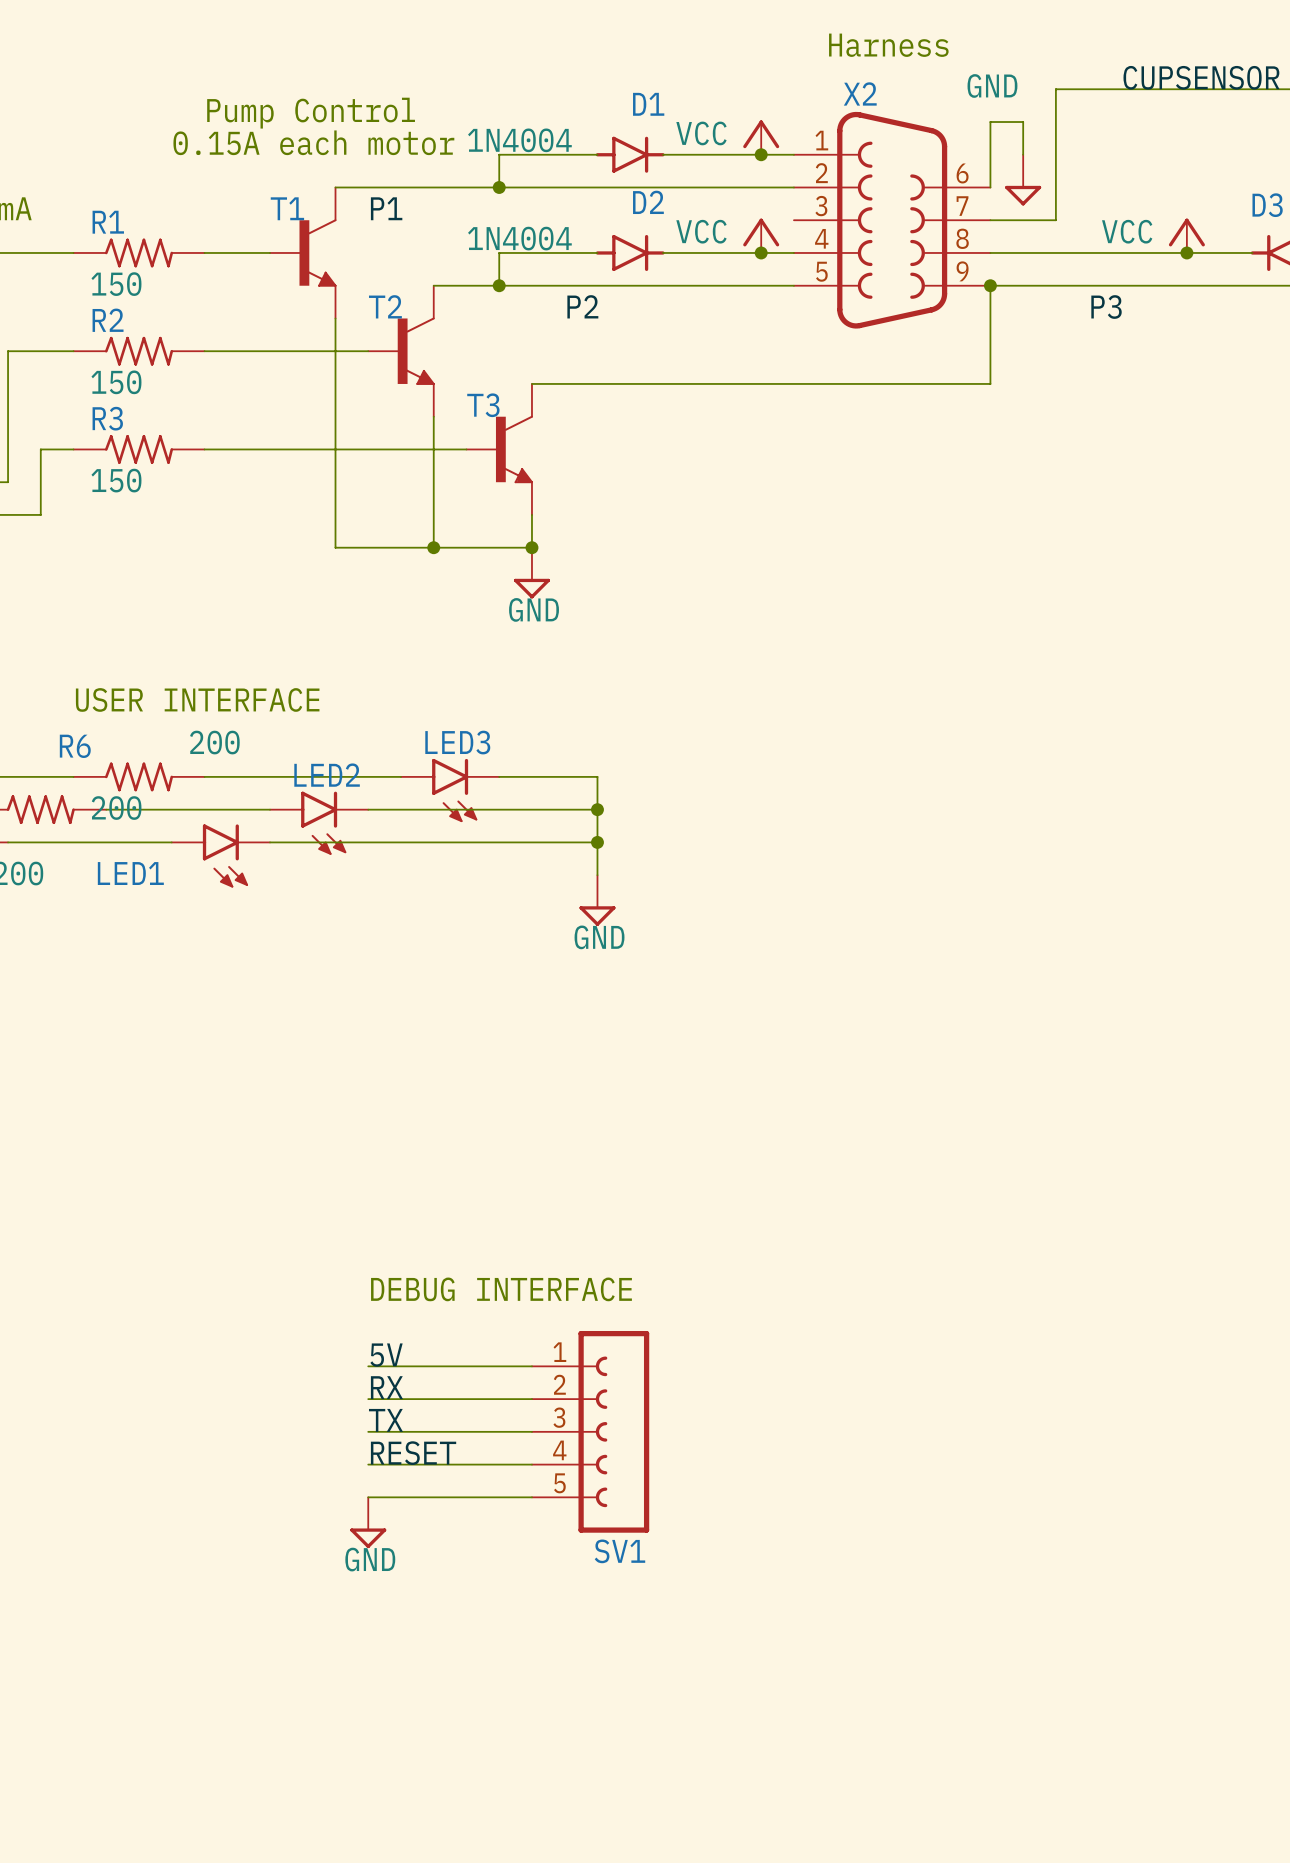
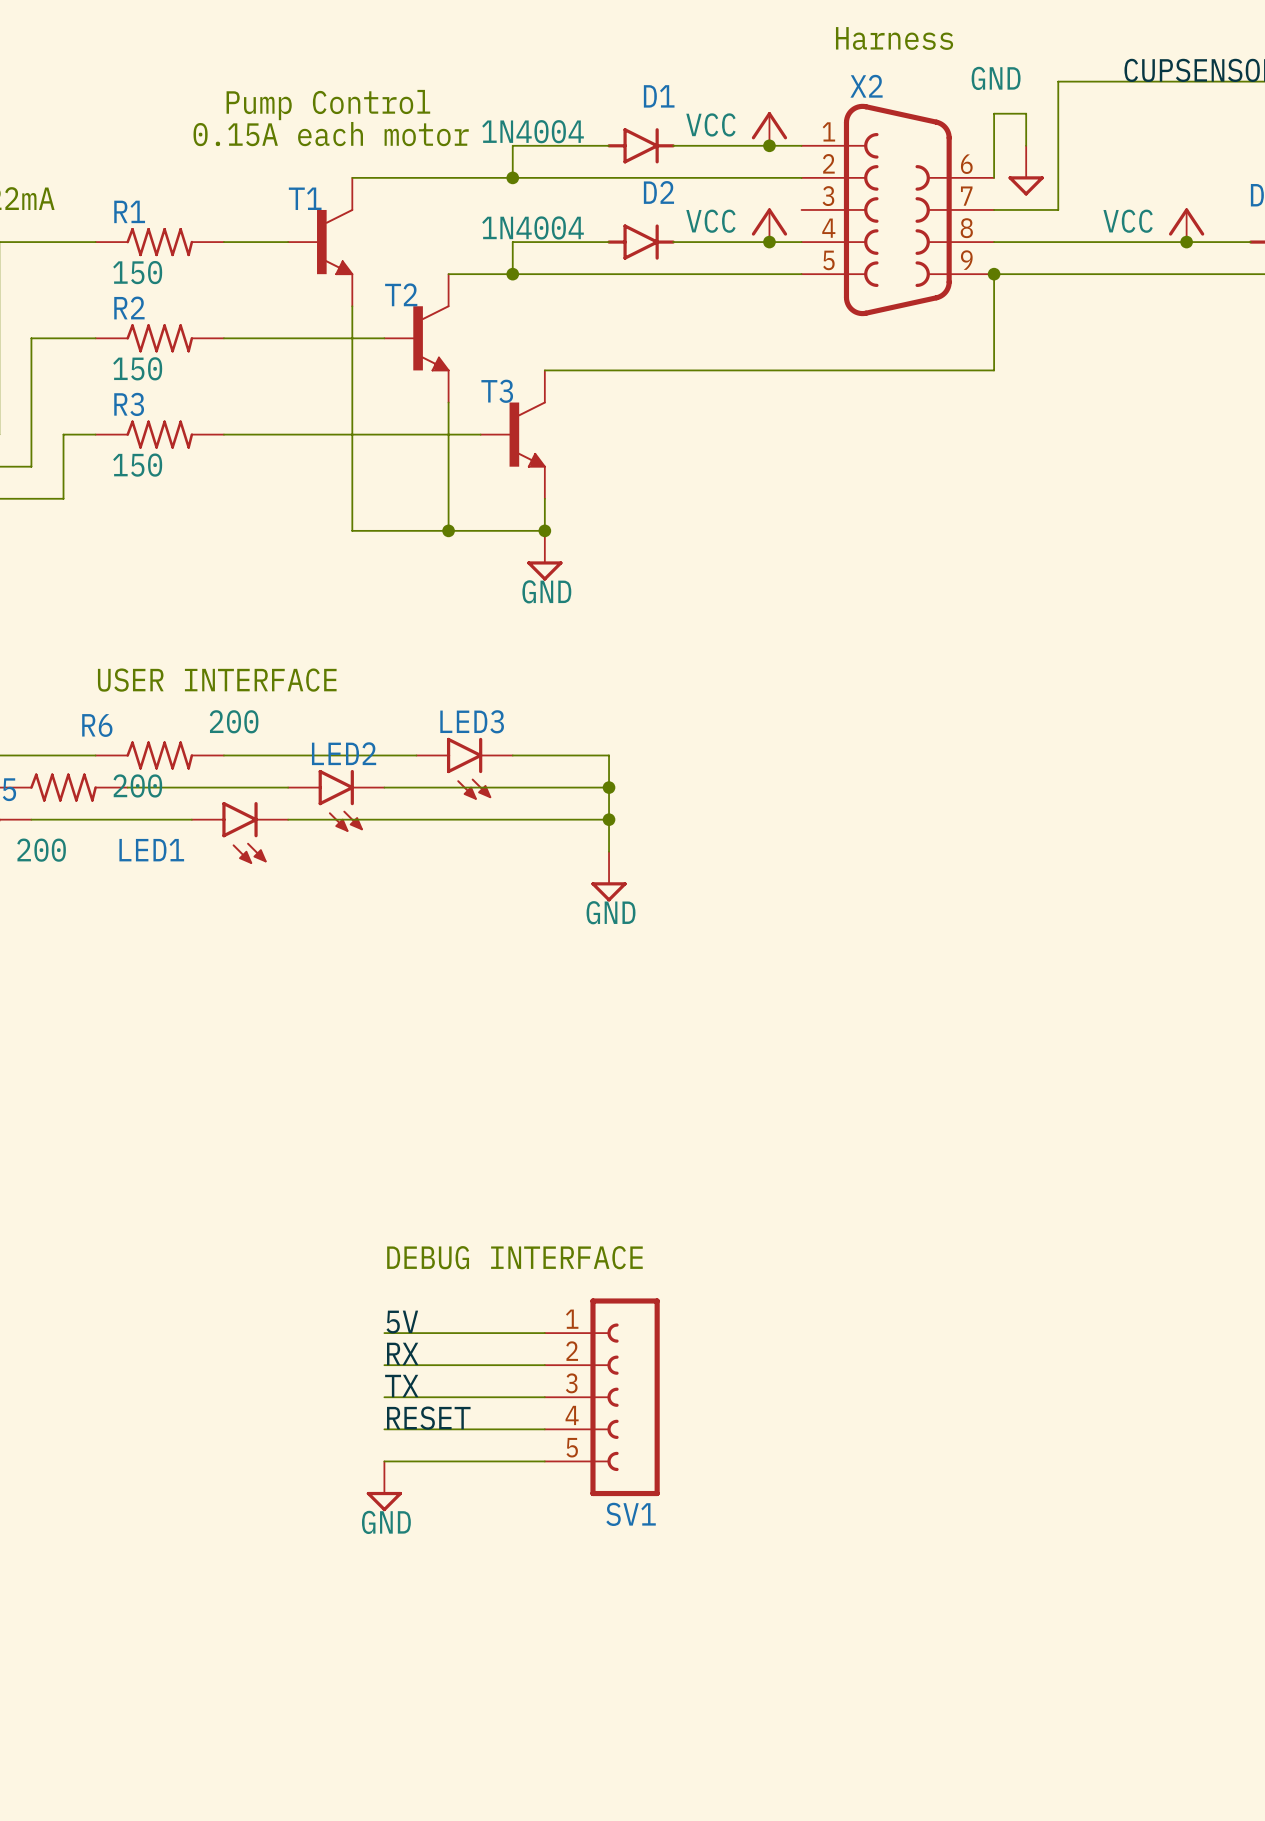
label: P1 (386, 208) -> none
label: P2 (582, 306) -> none
label: P3 (1106, 307) -> none

